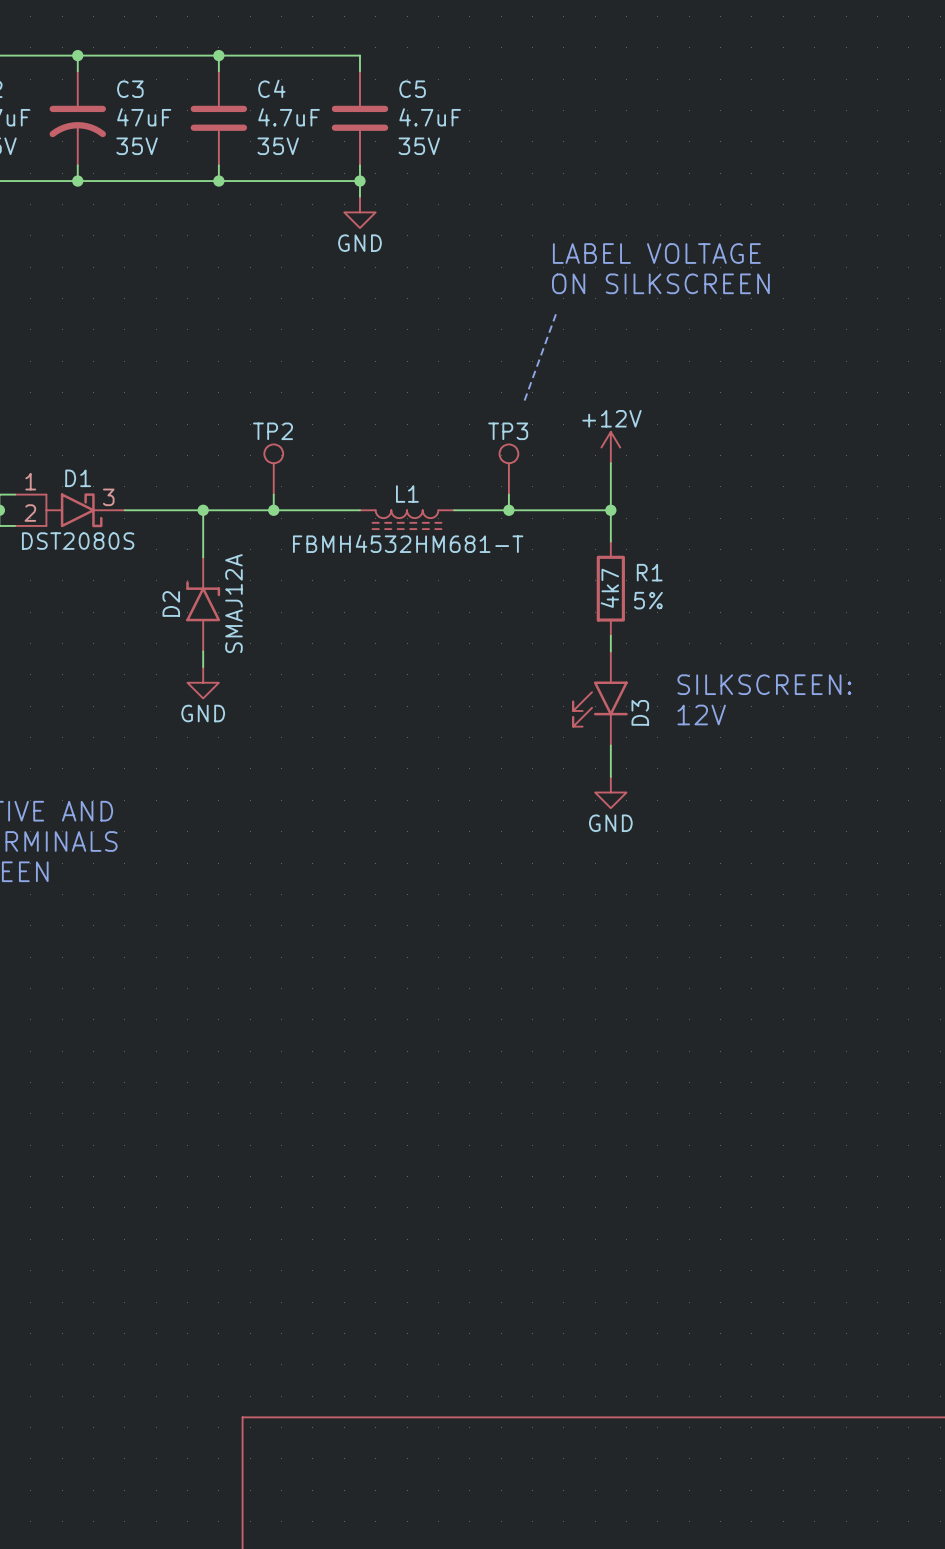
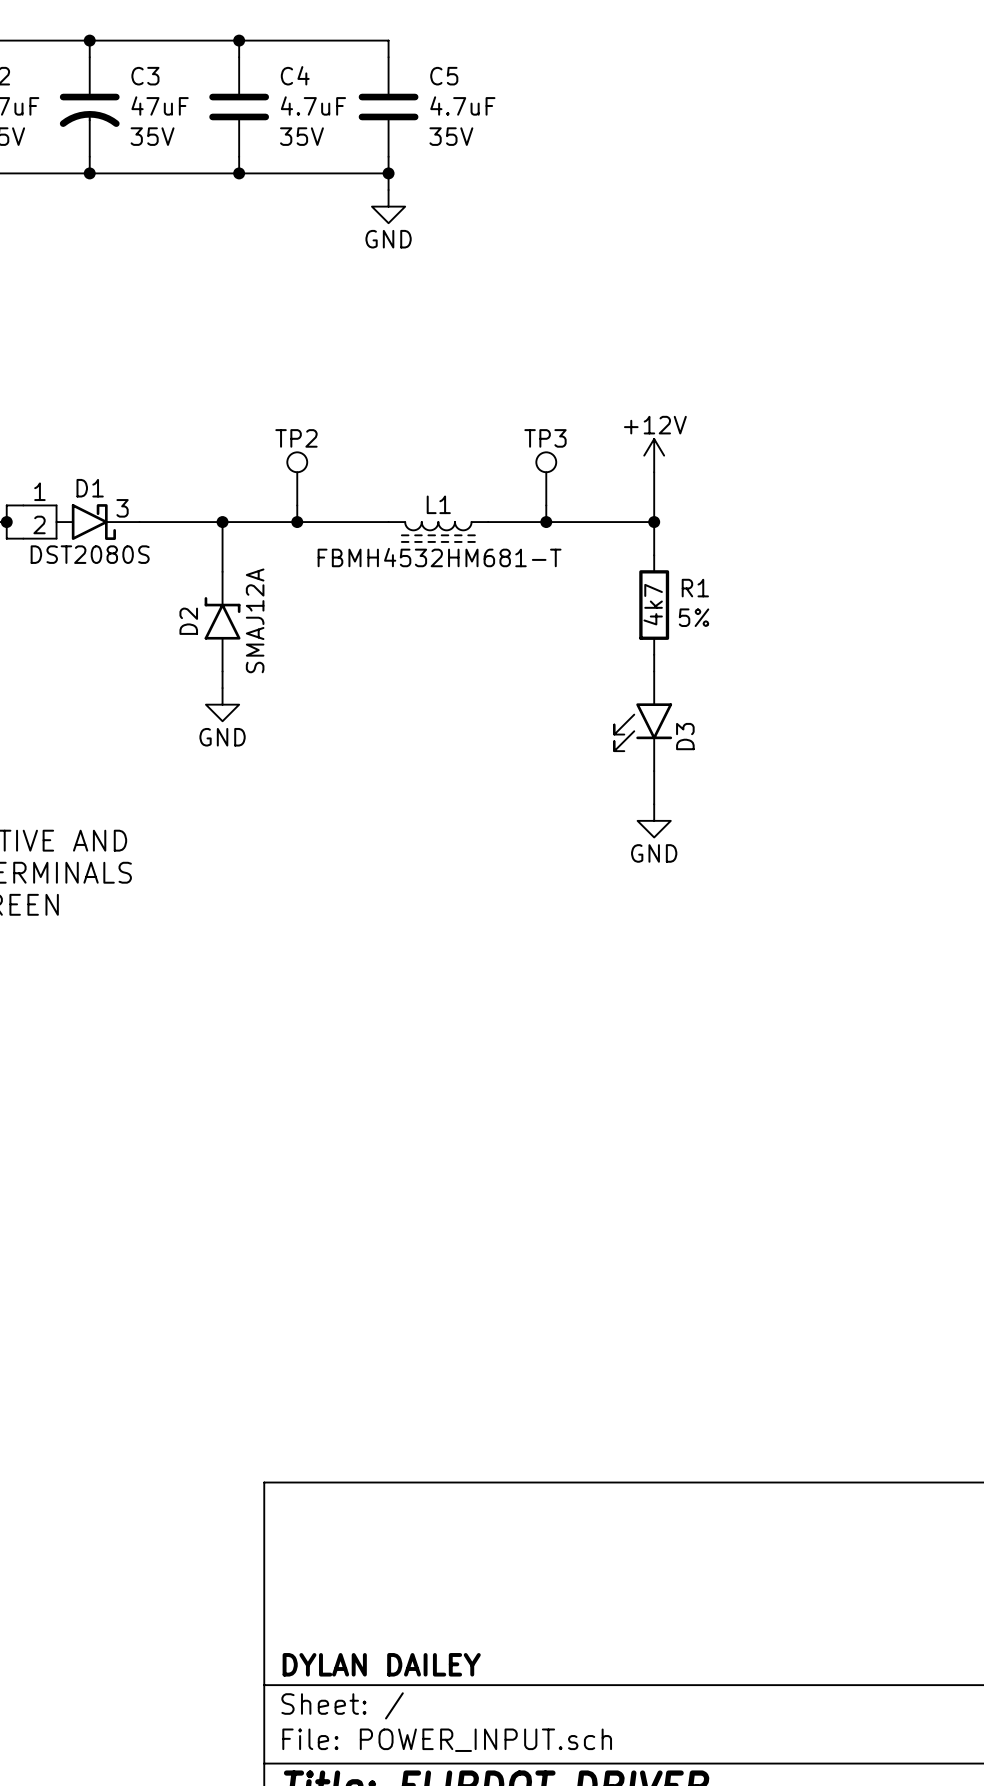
text: LABEL VOLTAGE (656, 253) -> none
text: ON SILKSCREEN (660, 283) -> none
line: (555, 314) (524, 400) -> none
text: SILKSCREEN: (764, 684) -> none
text: 12V (701, 714) -> none

